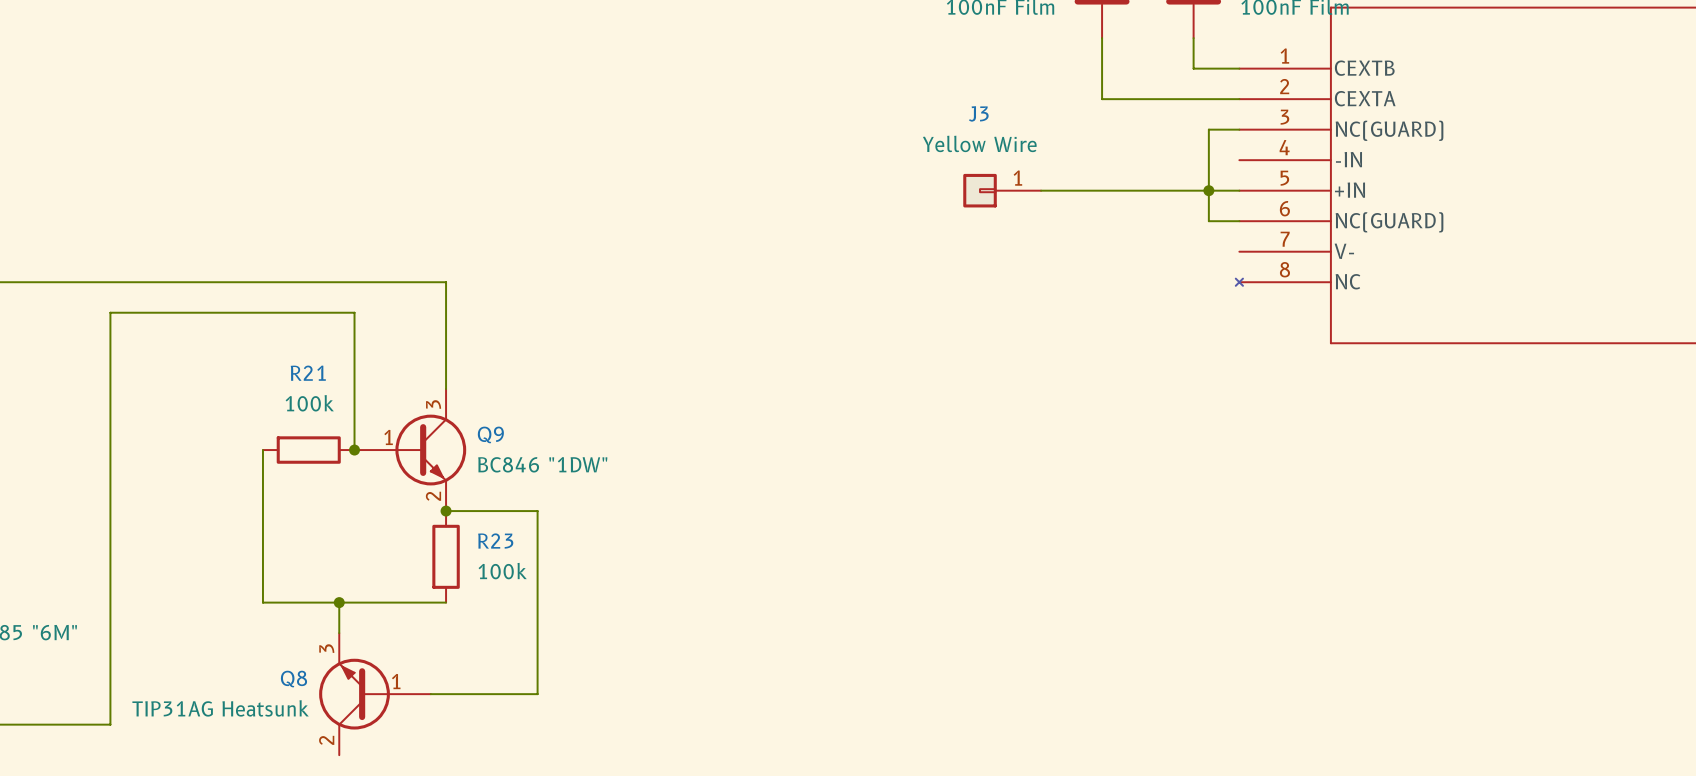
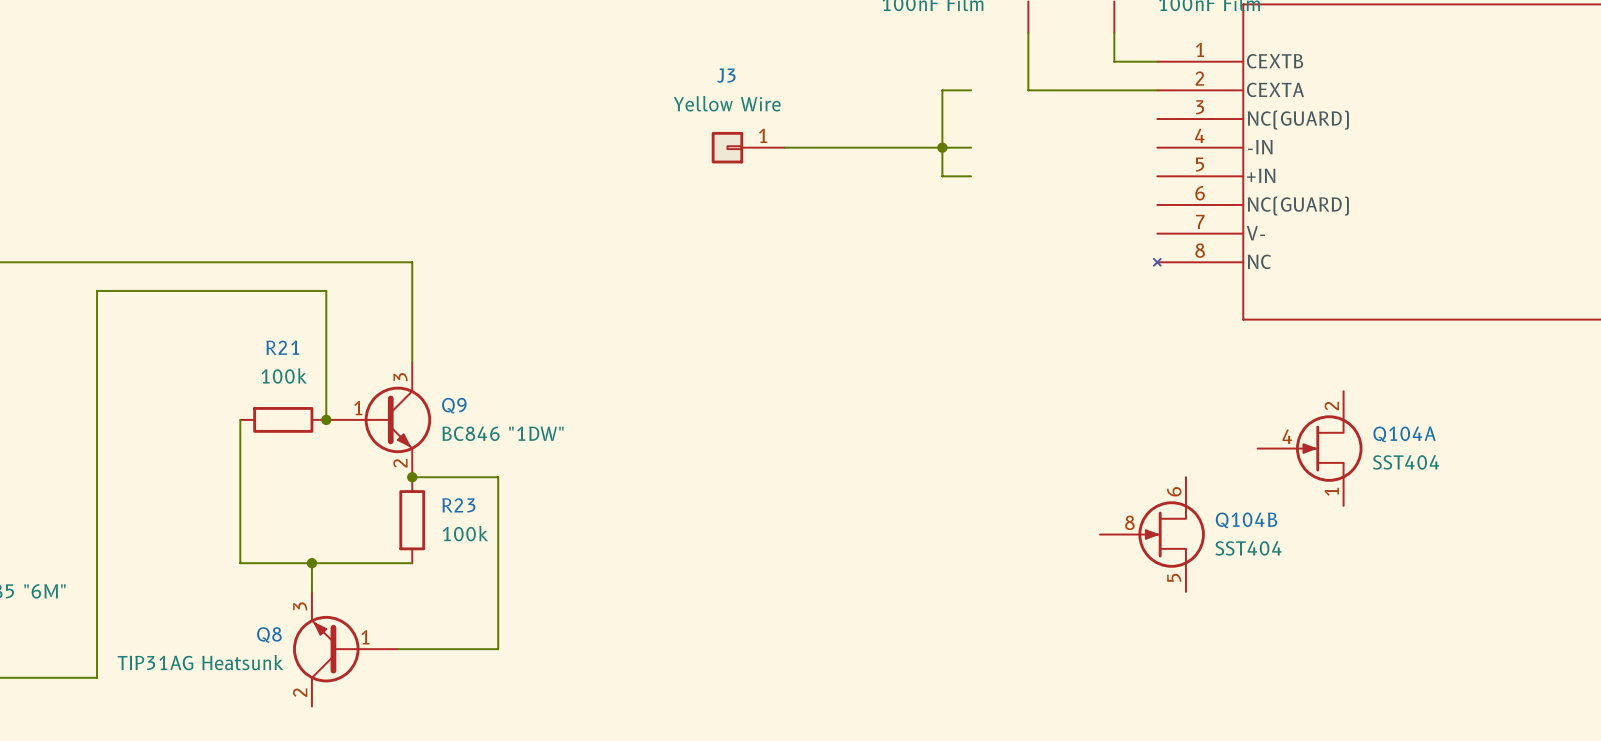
wire: (1239, 129) (1208, 129) (1208, 221) (1239, 221) -> none
wire: none -> (784, 147) (971, 147)
junction: none -> (942, 147)
J3 position: (1002, 190) -> (748, 147)
wire: (1041, 190) (1239, 190) -> (971, 176) (942, 176) (942, 90) (971, 90)
junction: (1208, 190) -> none
Q104A: none -> SST404 (1310, 448)
Q104B: none -> SST404 (1152, 534)

